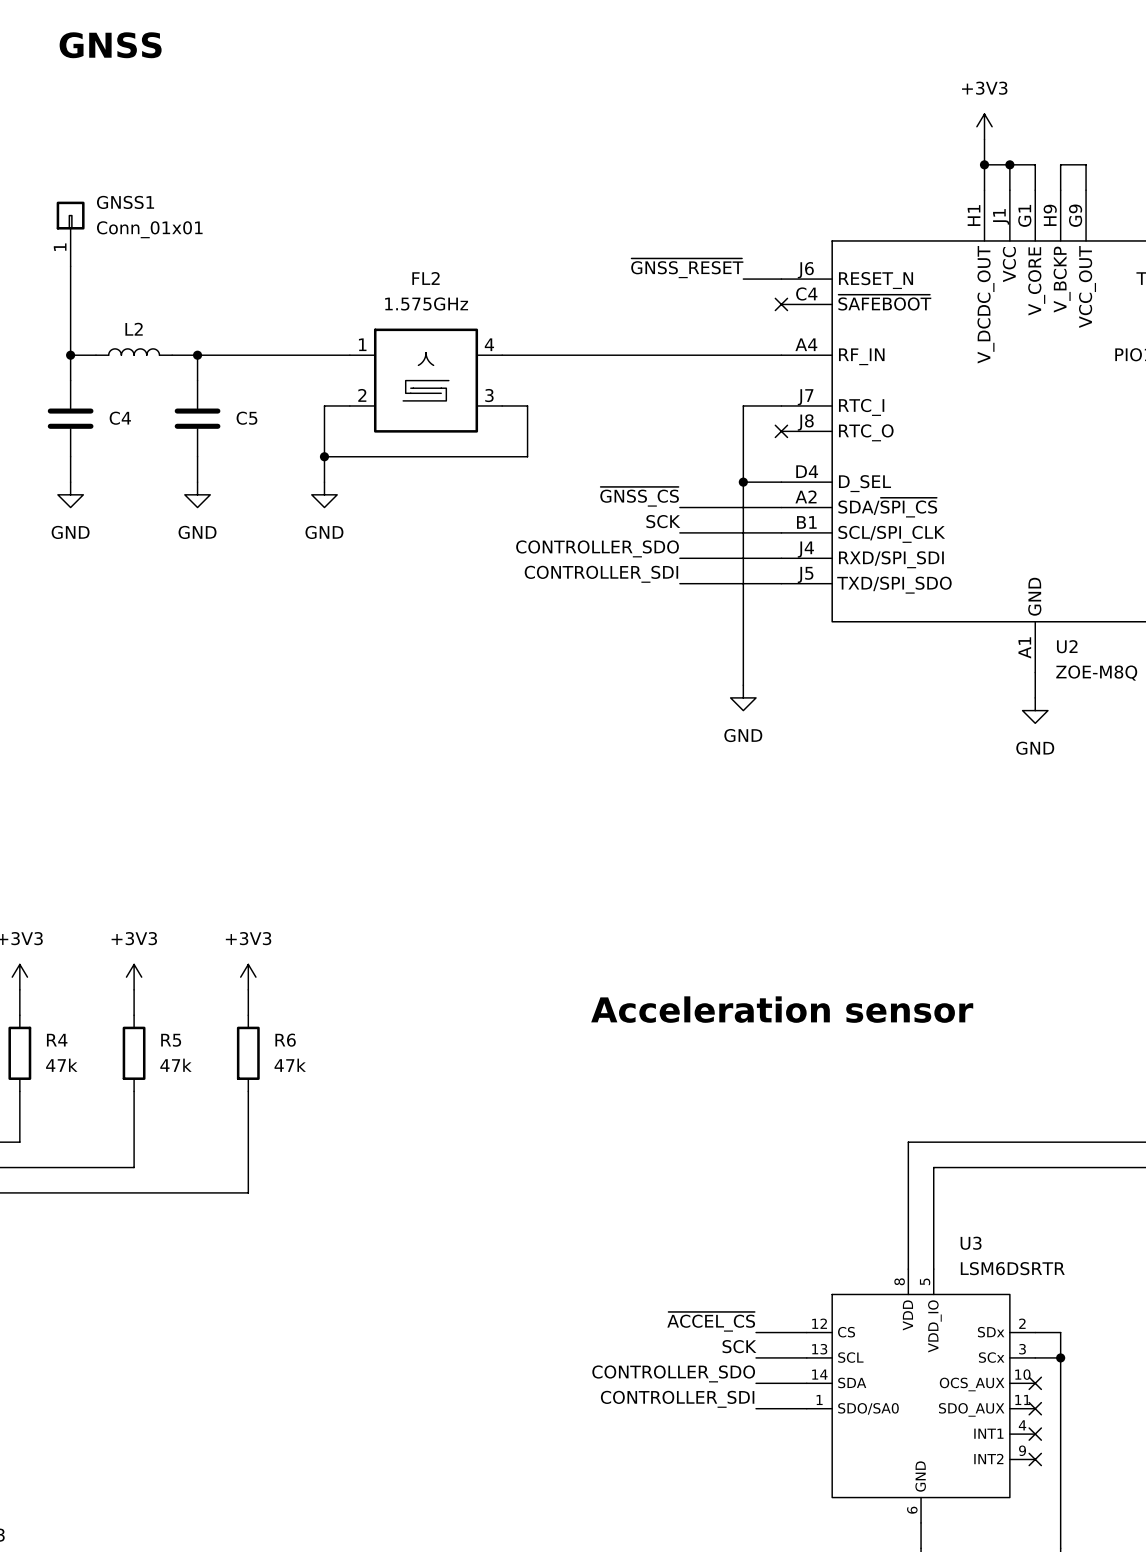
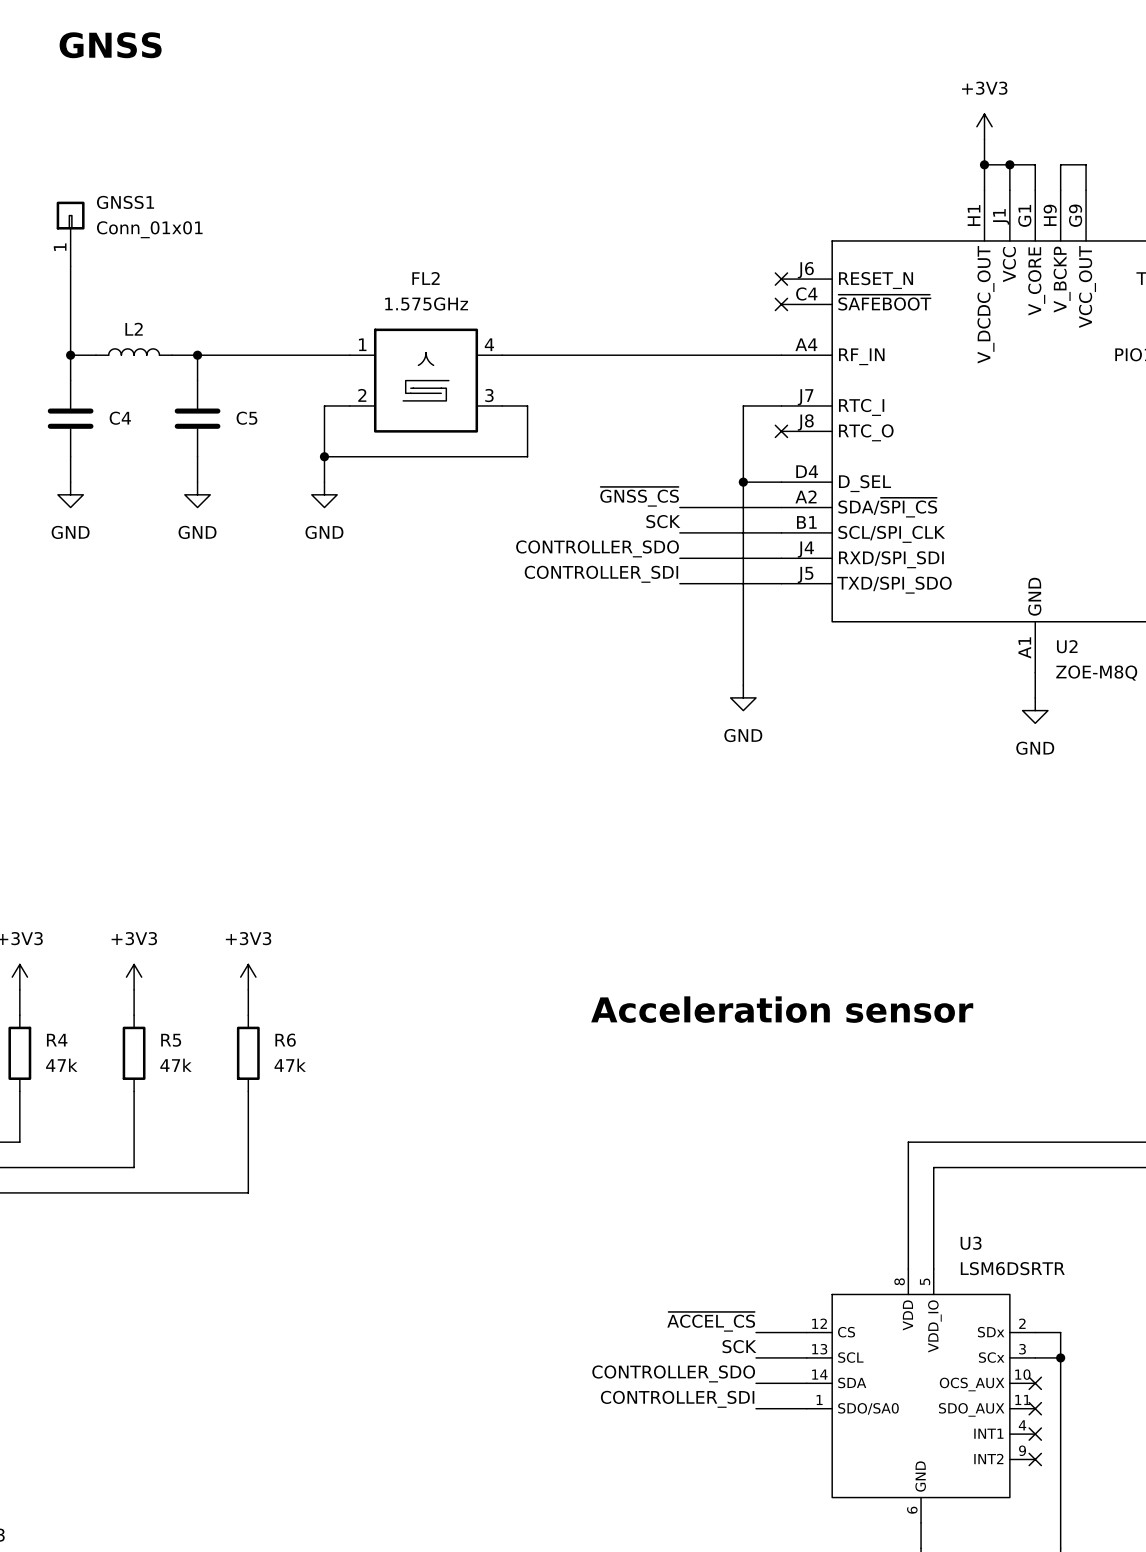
label: ~{GNSS_RESET} (687, 268) -> none
wire: (743, 279) (781, 279) -> none
no-connect mark: none -> (781, 279)

